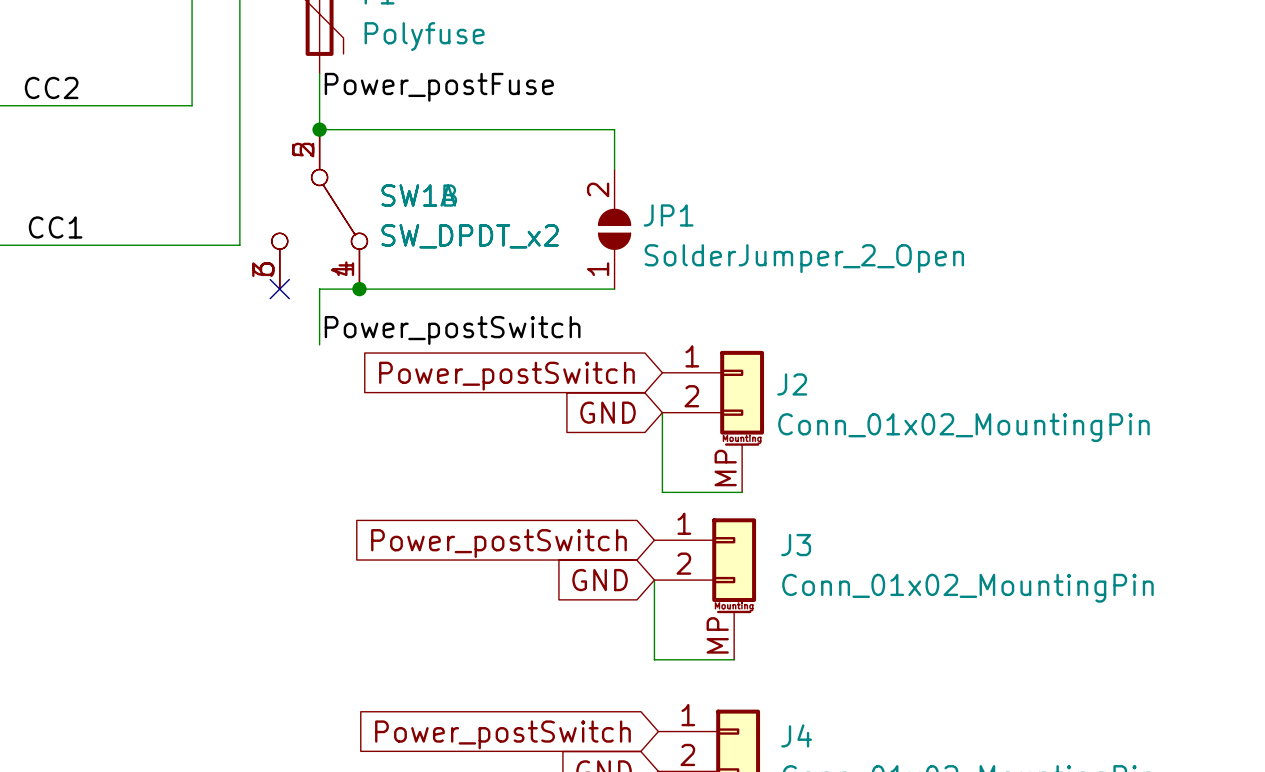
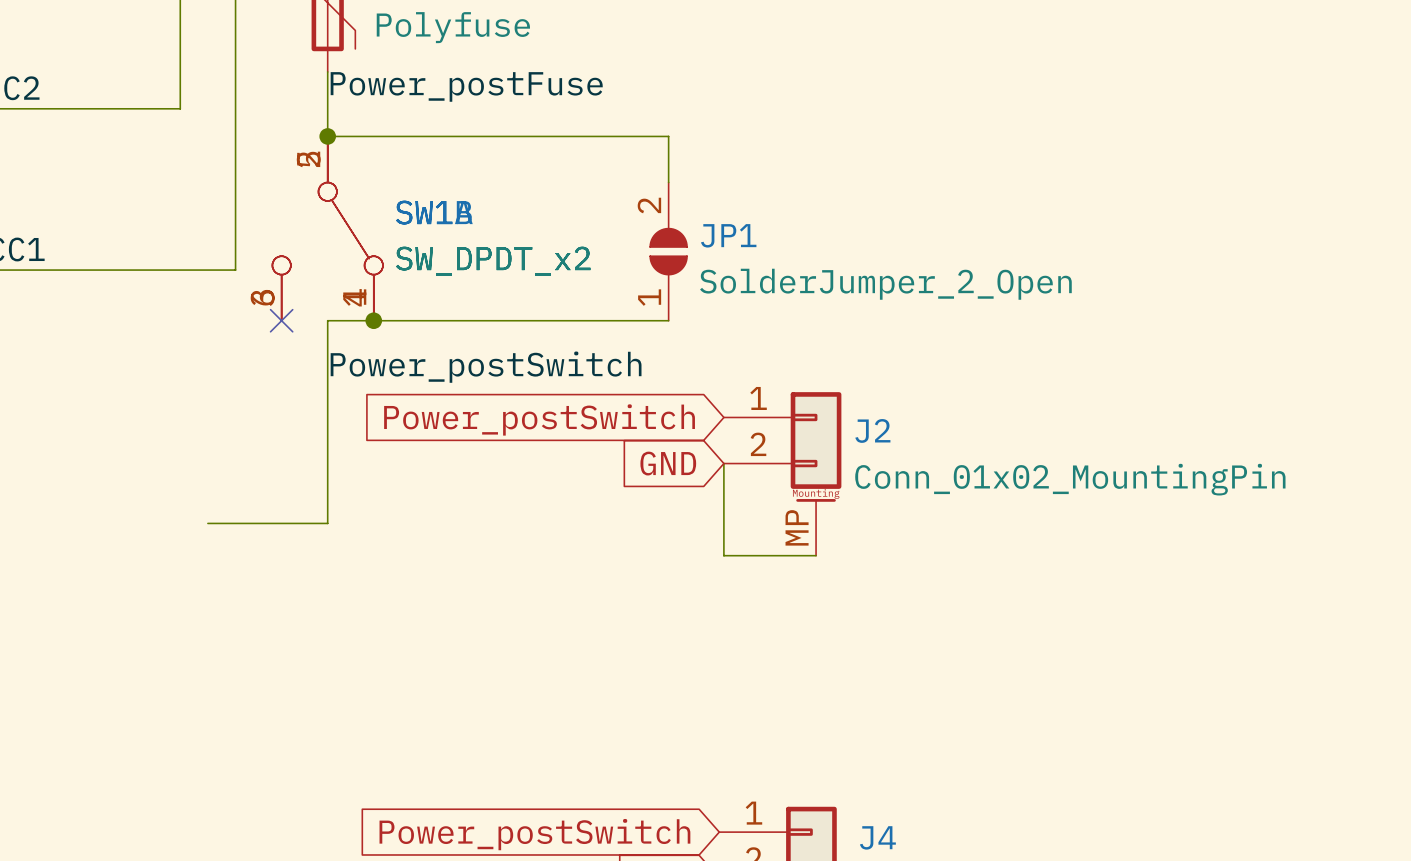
wire: none -> (327, 385) (327, 523) (207, 523)
global label: Power_postSwitch (498, 543) -> none
global label: GND (600, 580) -> none
wire: (654, 580) (654, 659) (734, 659) -> none
J3: Conn_01x02_MountingPin (705, 589) -> none

